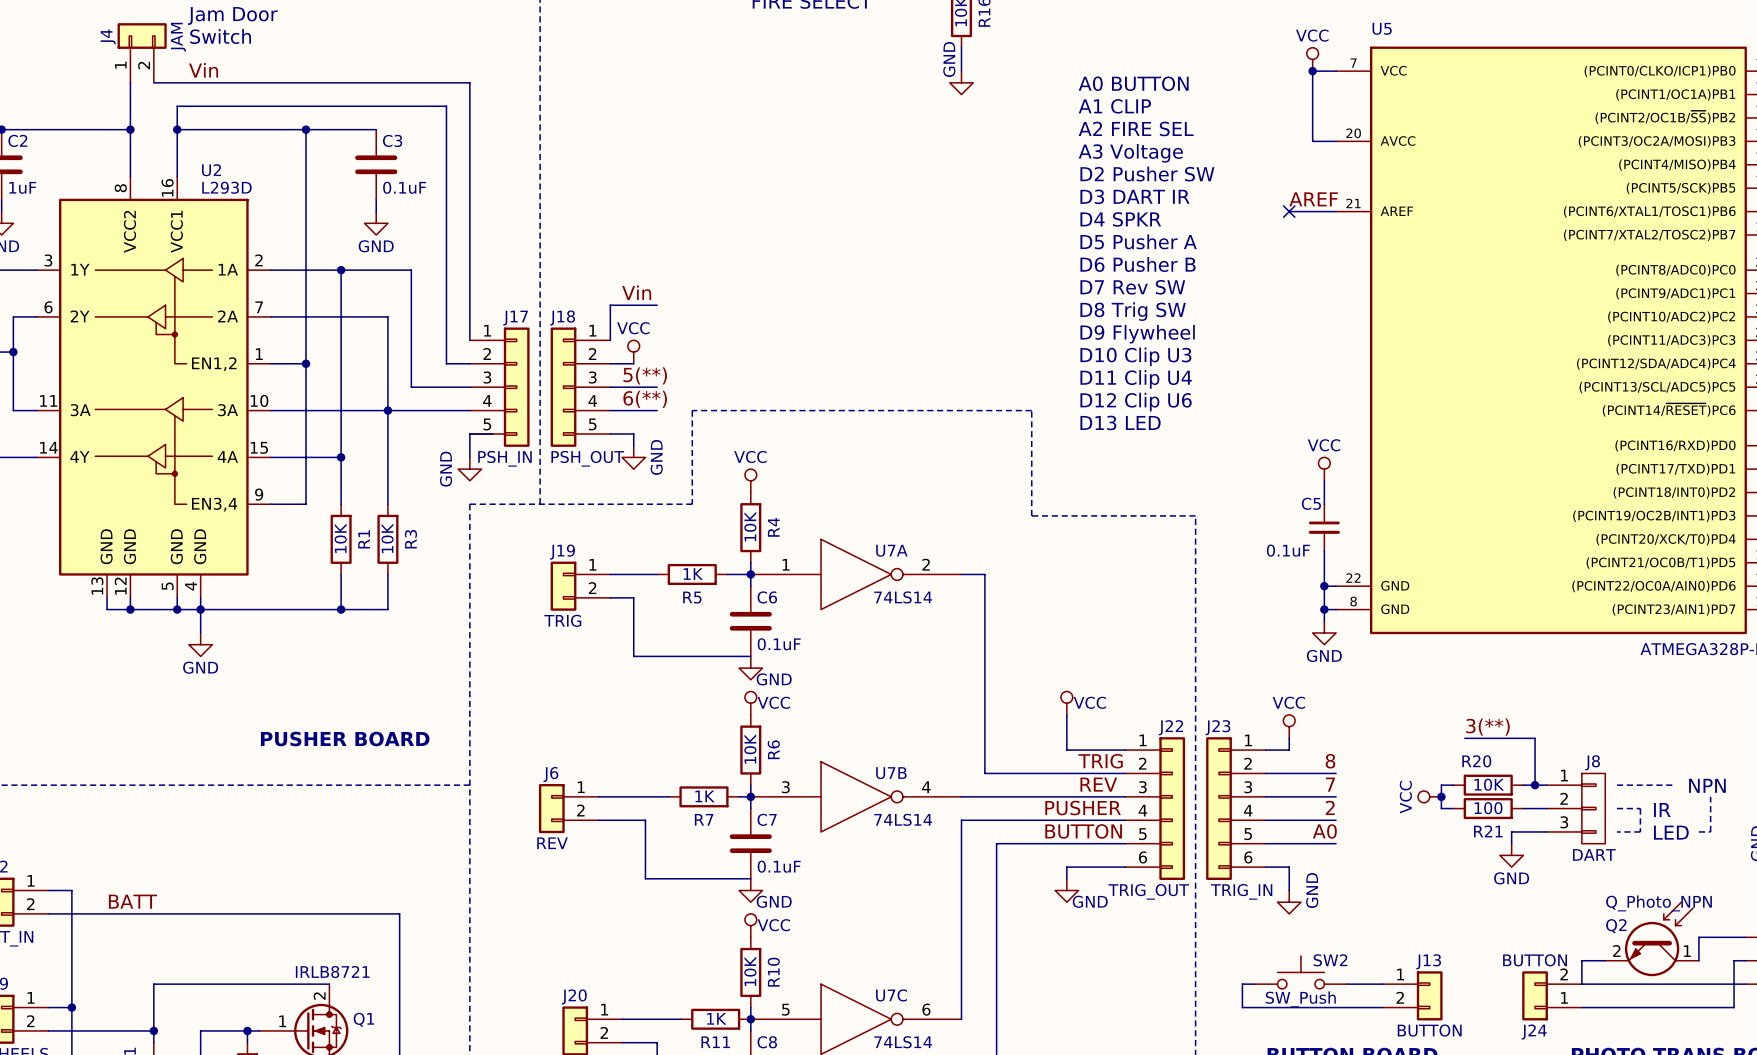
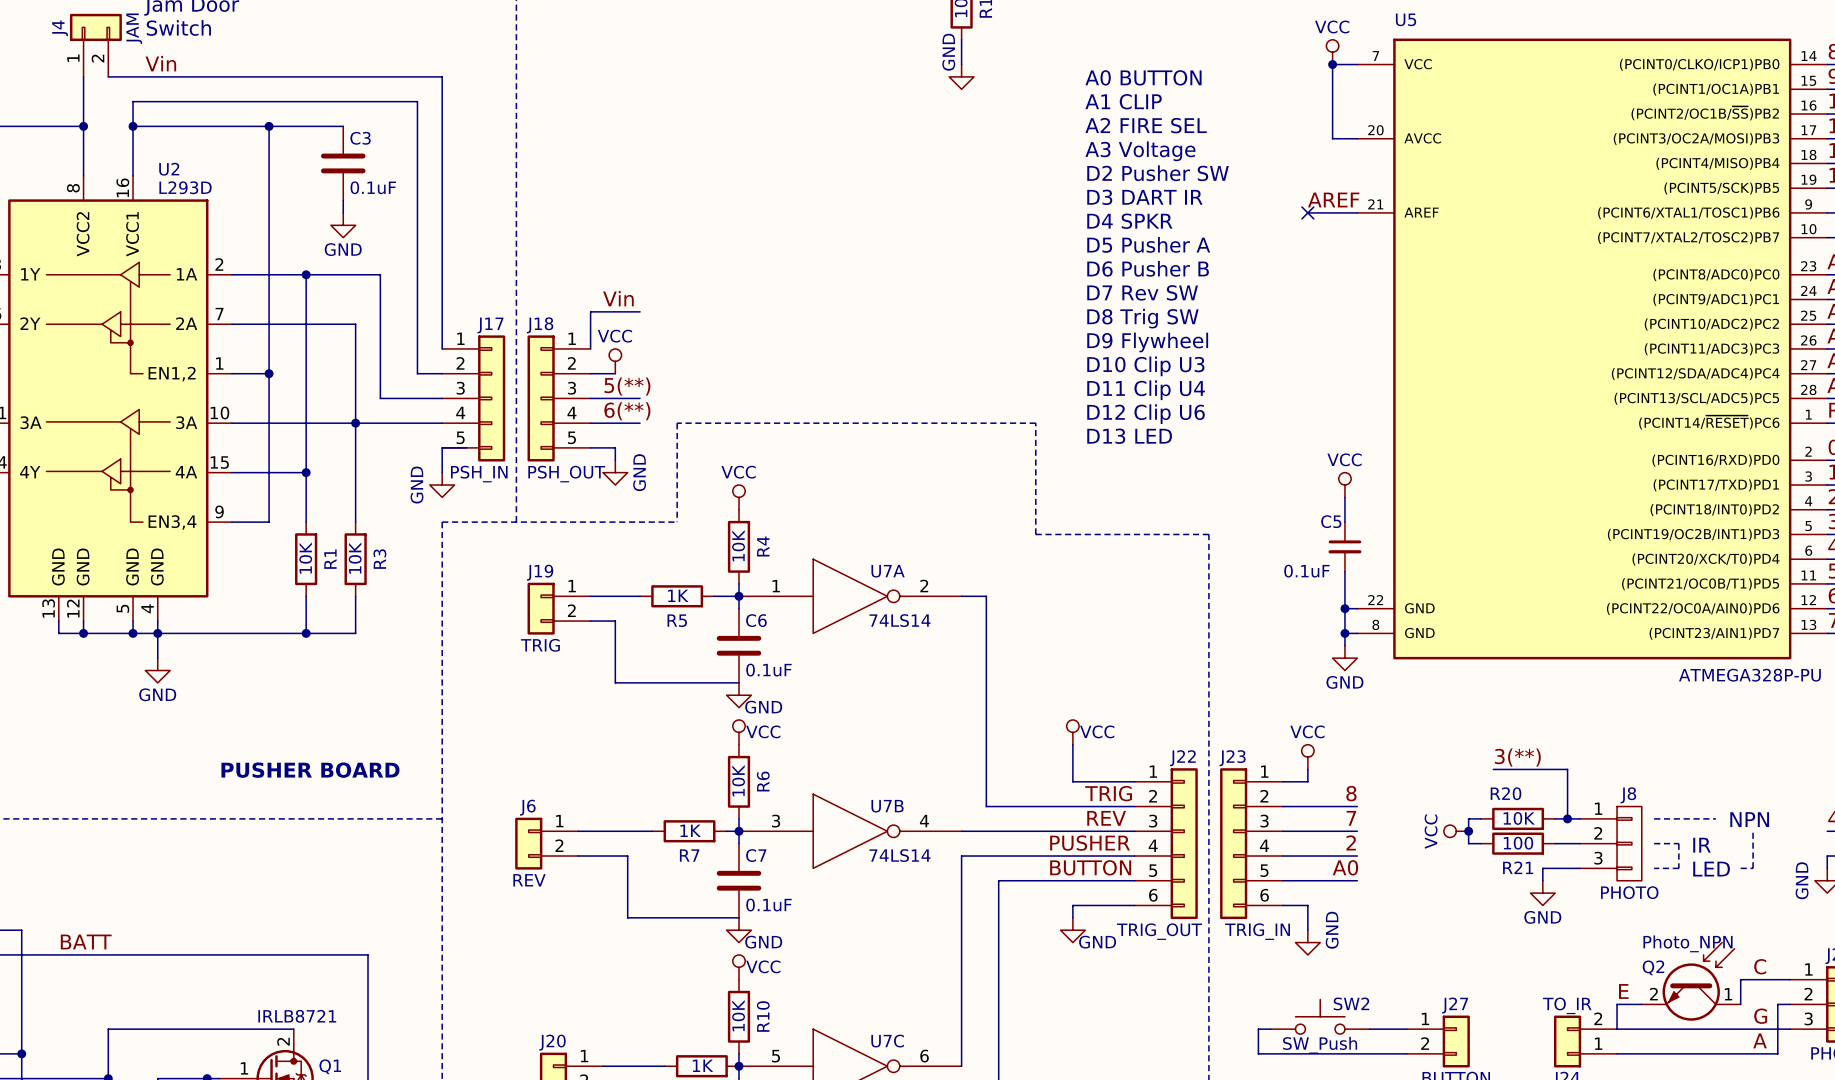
J8 value: DART (1594, 854) -> PHOTO (1629, 892)
Q2 value: Q_Photo_NPN (1659, 903) -> Photo_NPN (1688, 943)
label: none -> C (1760, 966)
label: none -> E (1623, 991)
J24 value: BUTTON (1535, 960) -> TO_IR (1567, 1005)
J13 name: J13 (1428, 961) -> J27 (1455, 1005)
label: none -> G (1760, 1016)
label: none -> A (1760, 1040)

